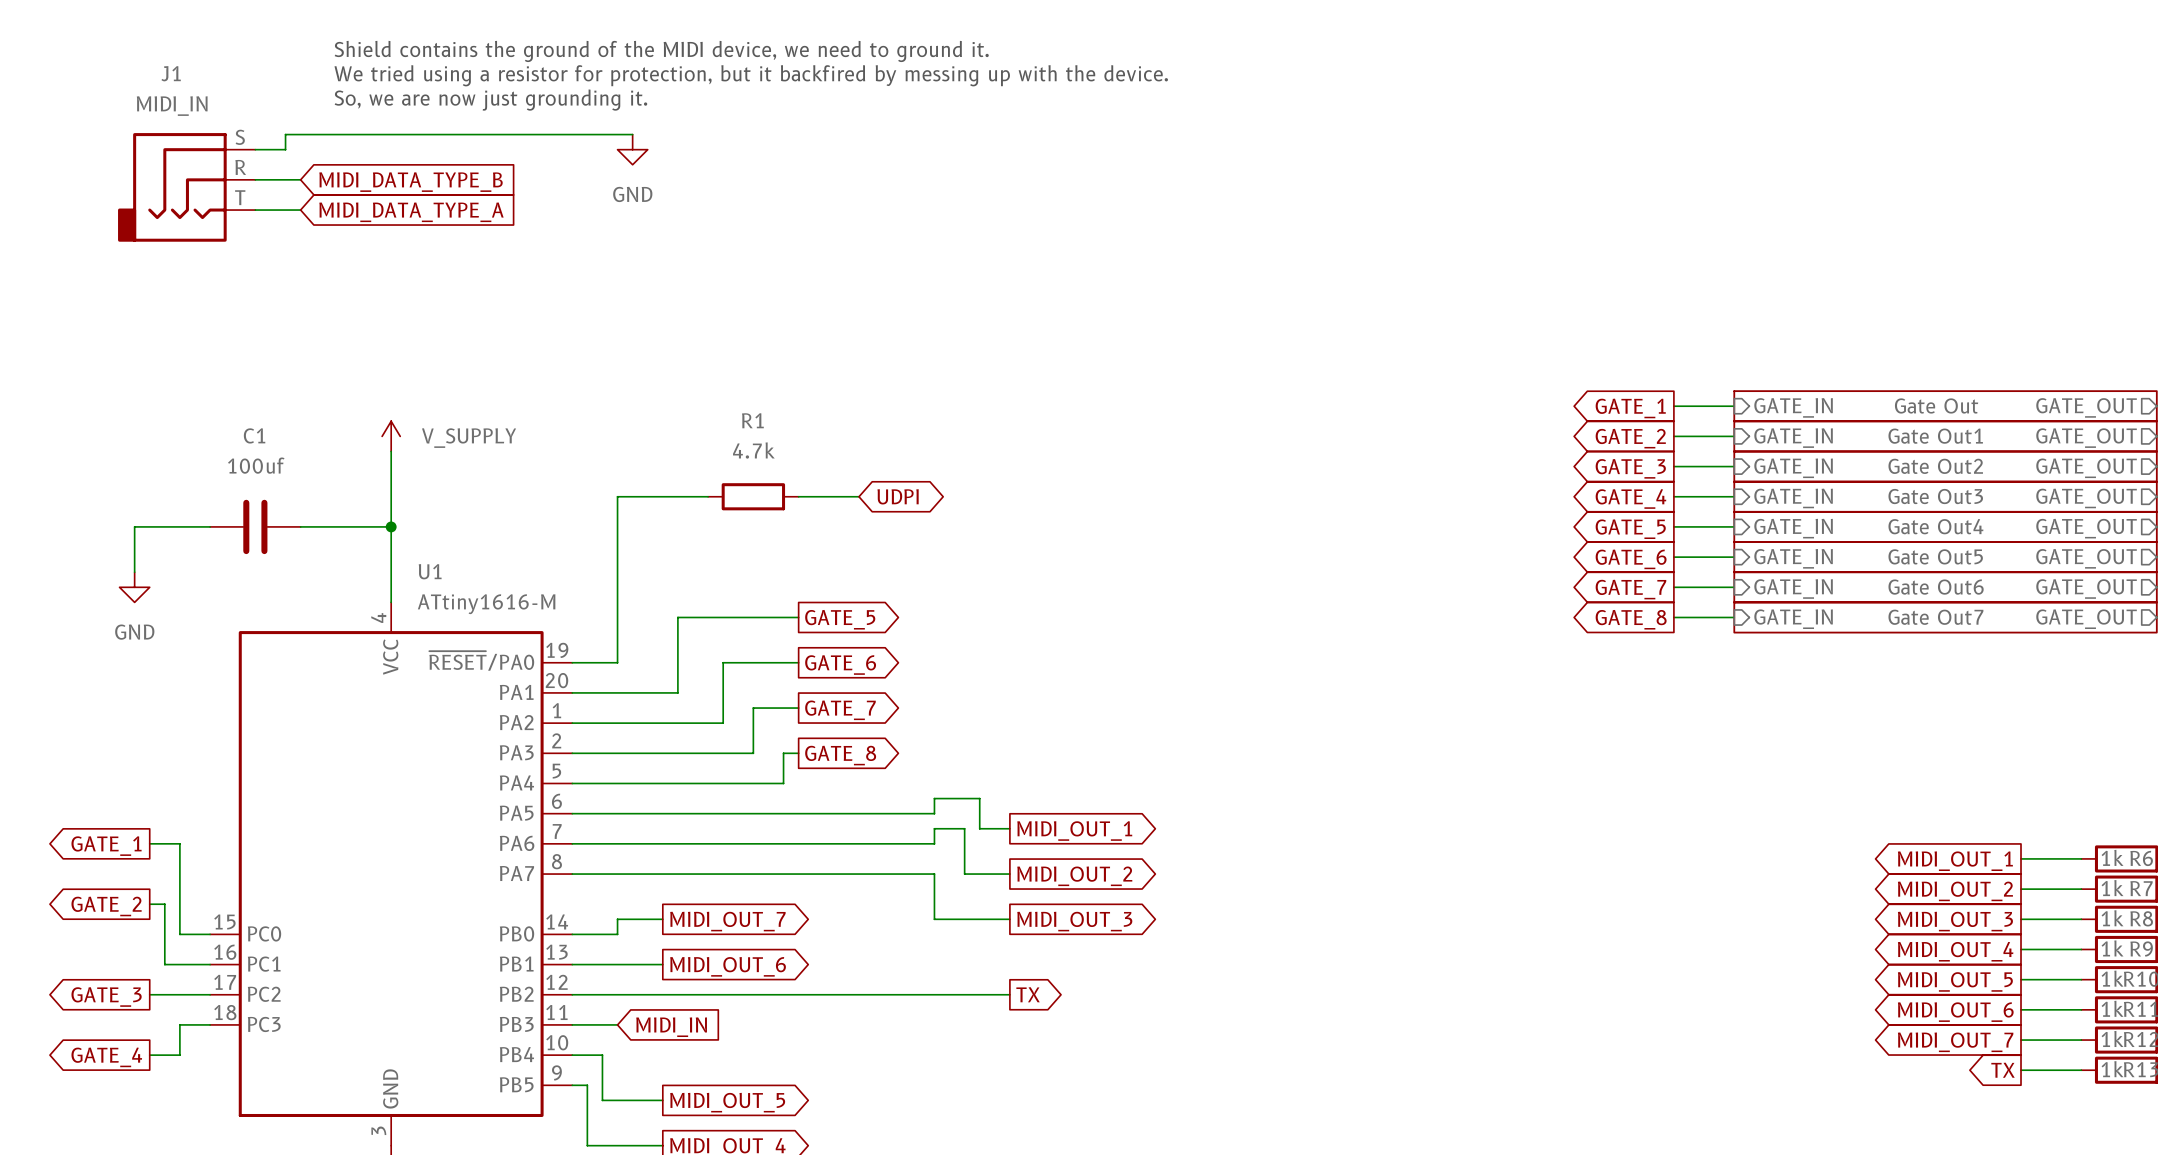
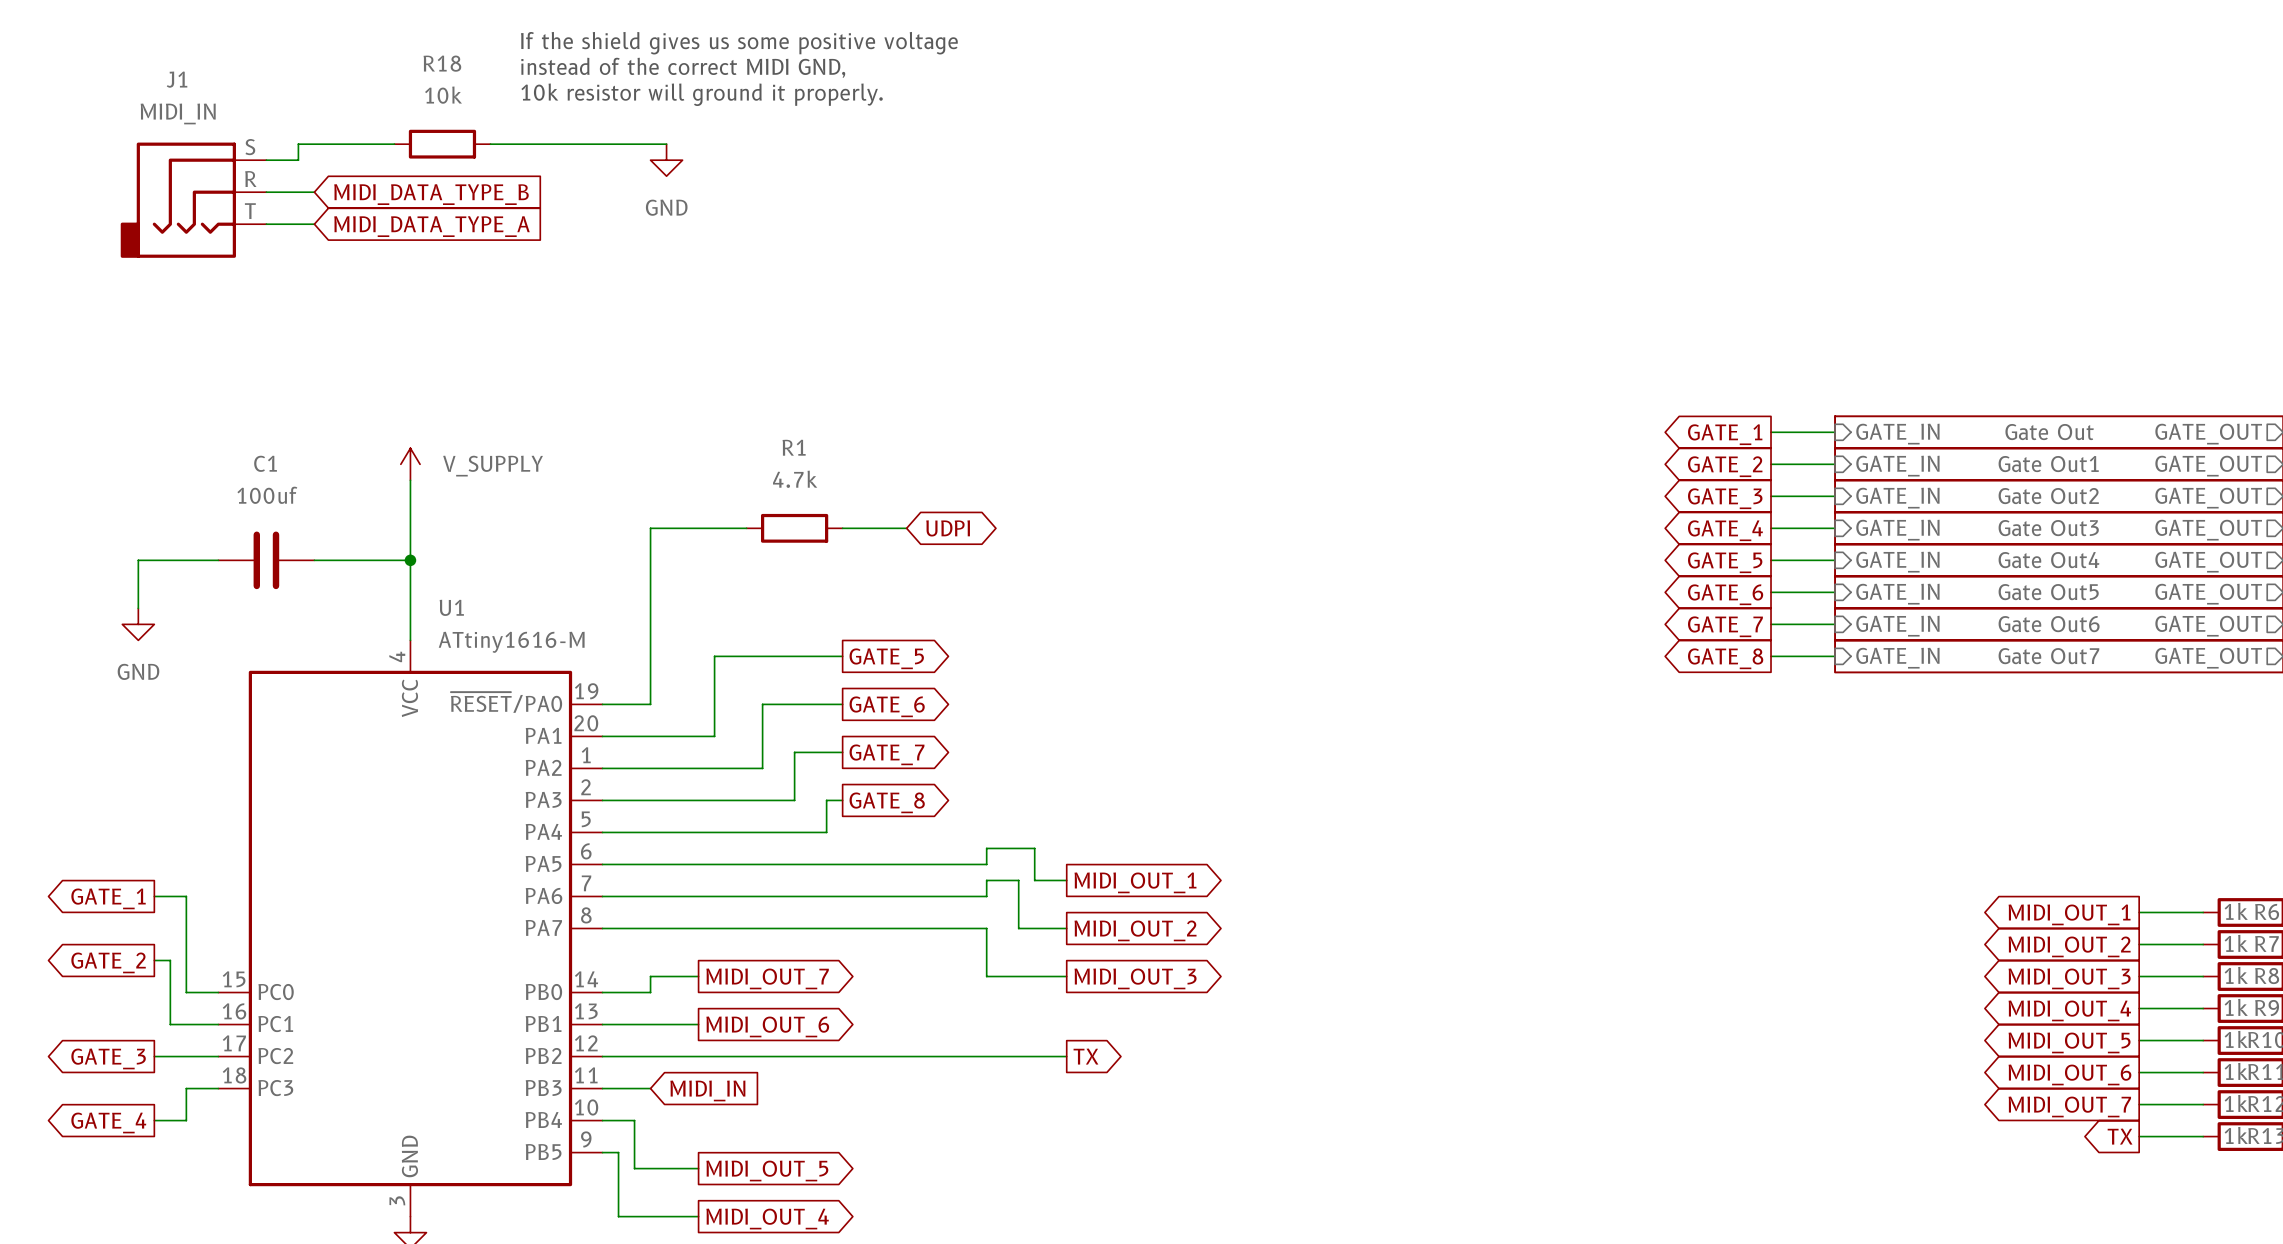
text: none -> If the shield gives us some positive voltage (739, 43)
text: Shield contains the ground of the MIDI device, we need to ground it. (661, 51) -> none
text: none -> instead of the correct MIDI GND, (683, 67)
text: We tried using a resistor for protection, but it backfired by messing up with the device. (751, 75) -> none
text: none -> 10k resistor will ground it properly. (702, 94)
text: So, we are now just grounding it. (490, 100) -> none
wire: (376, 134) (466, 134) -> none
R18: none -> 10k (442, 144)

